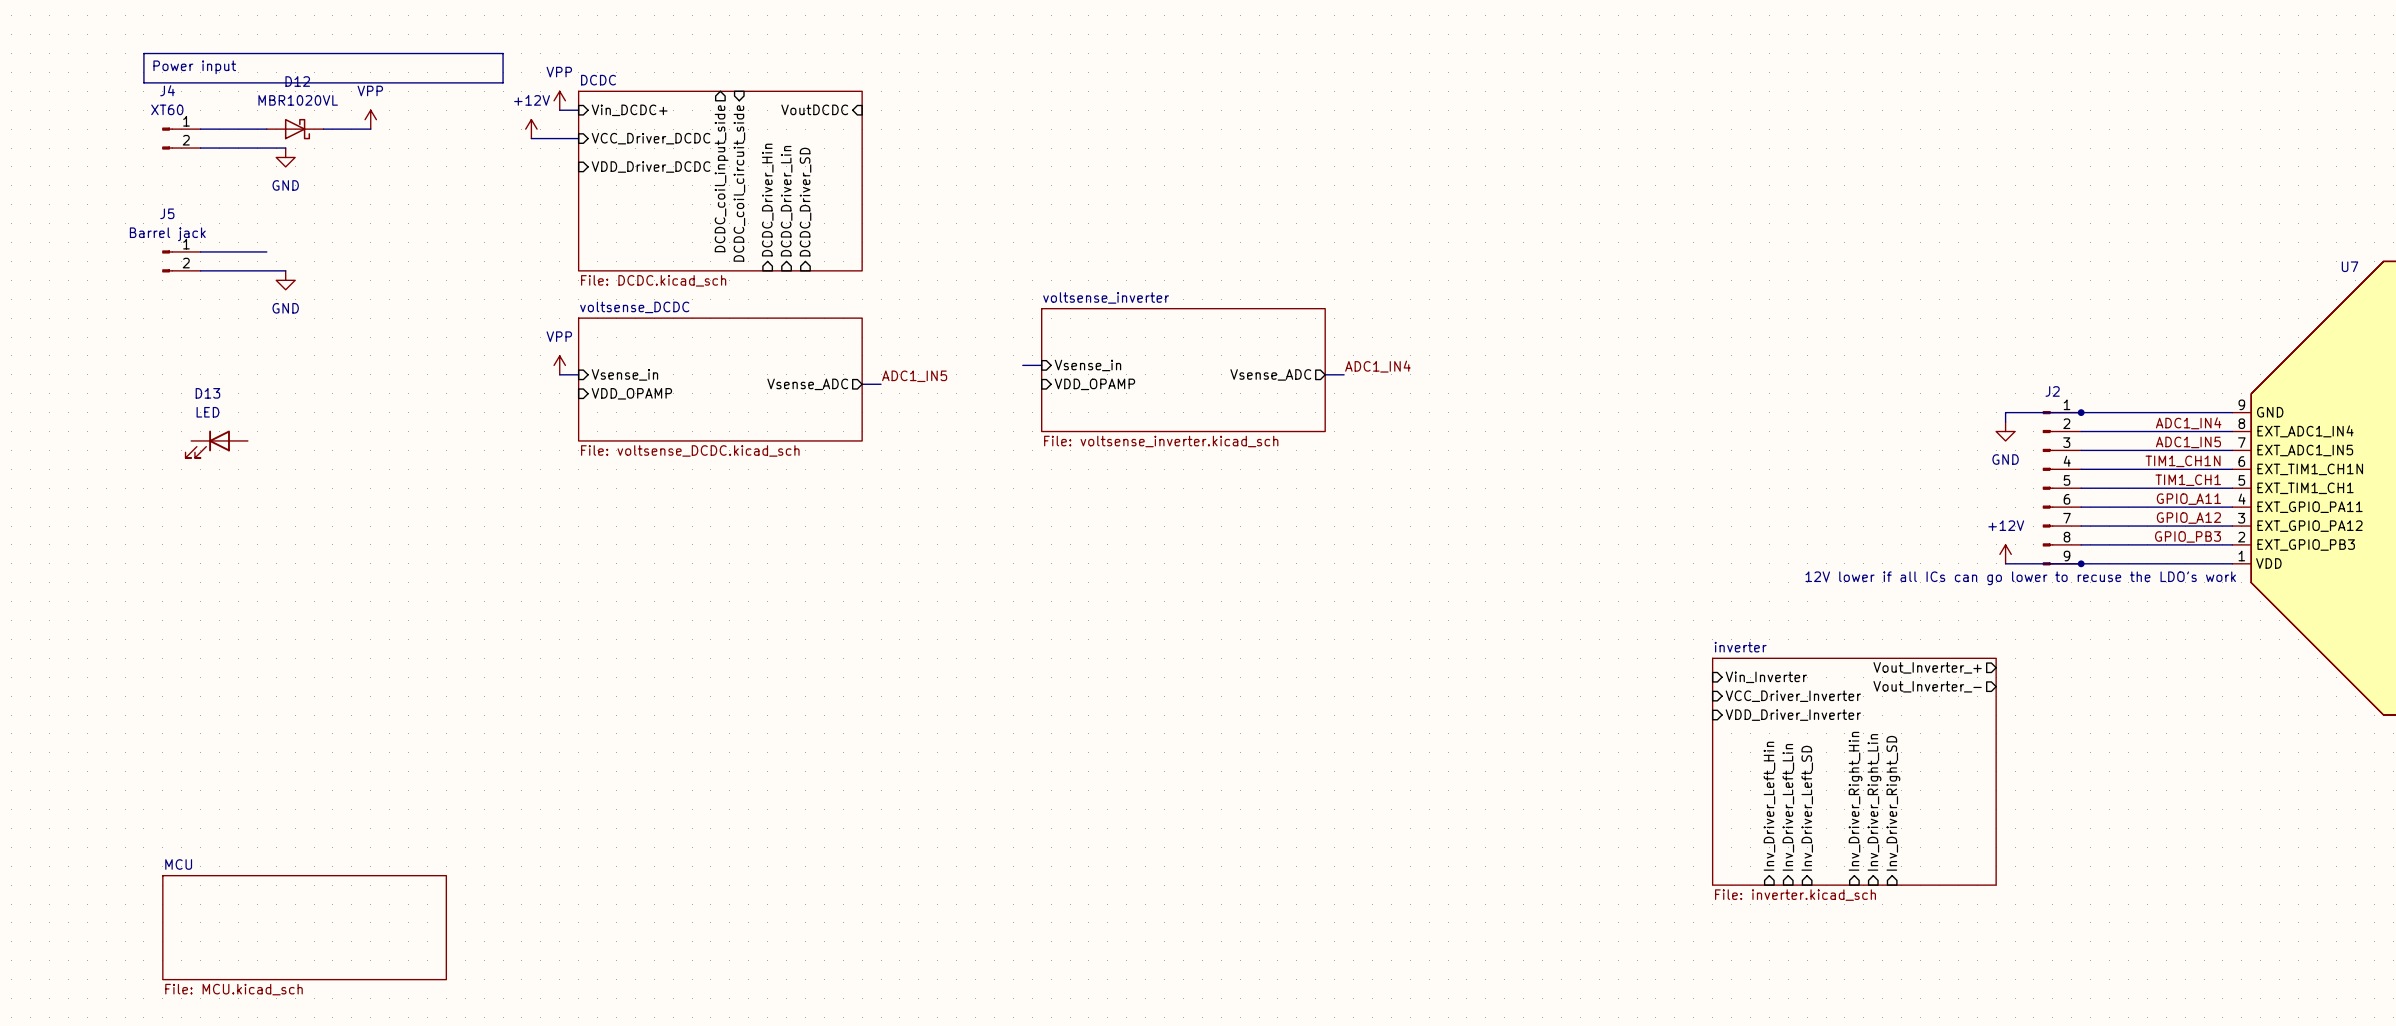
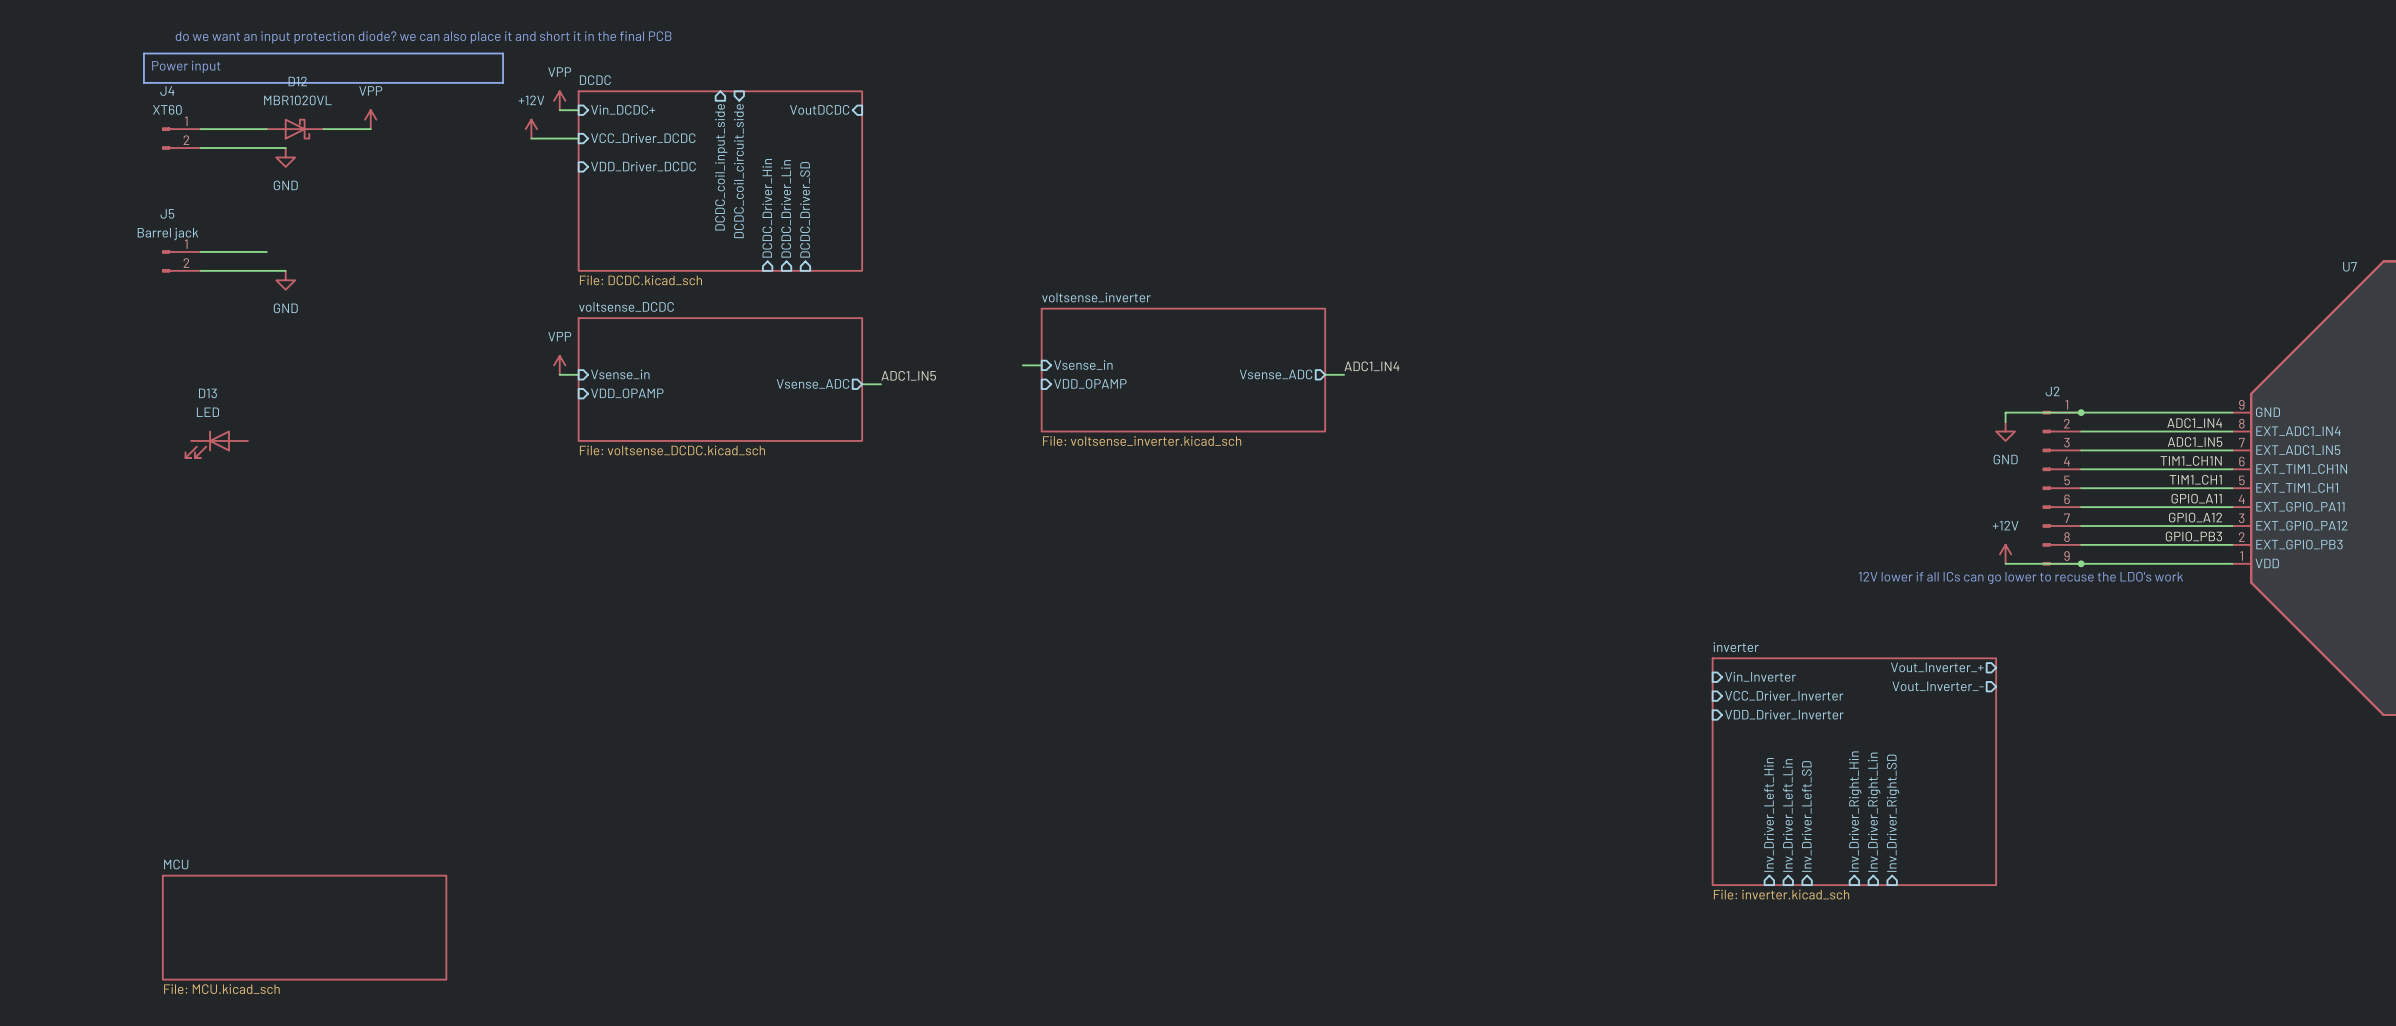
text: none -> do we want an input protection diode? we can also place it and short it in the final PCB (423, 37)

